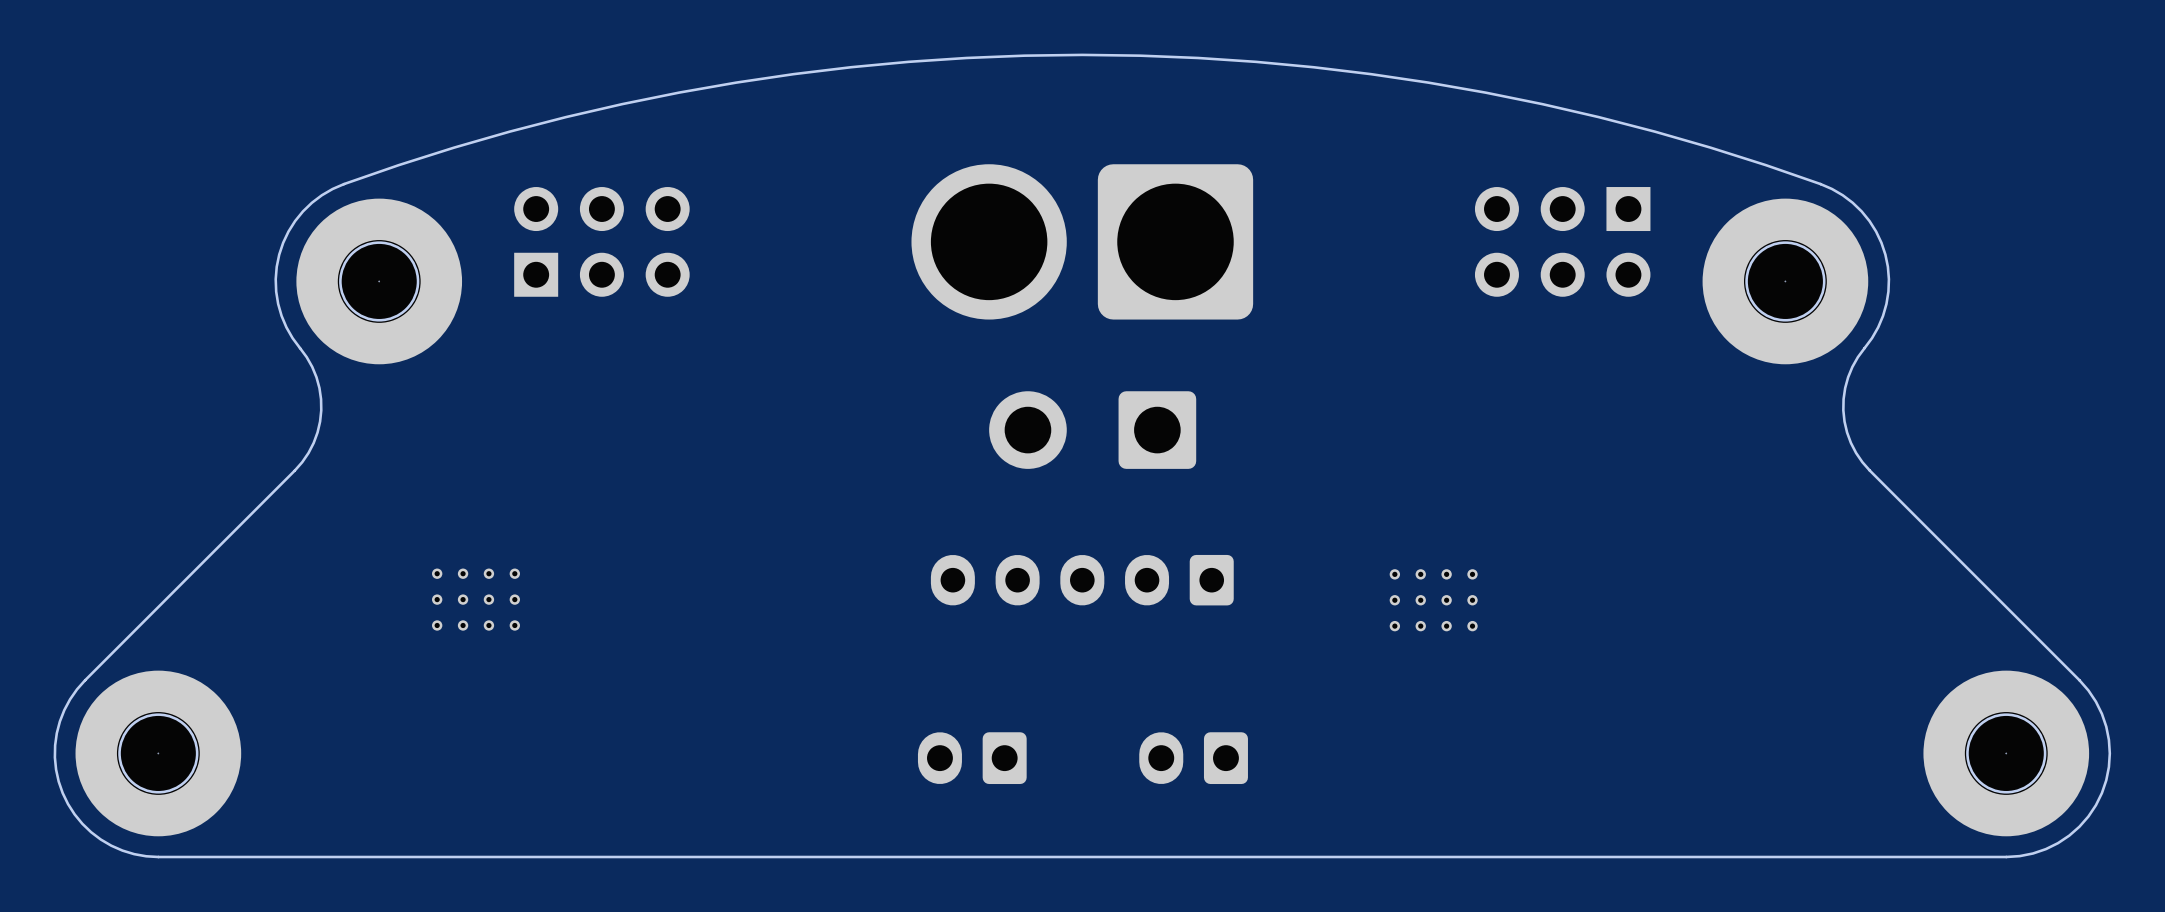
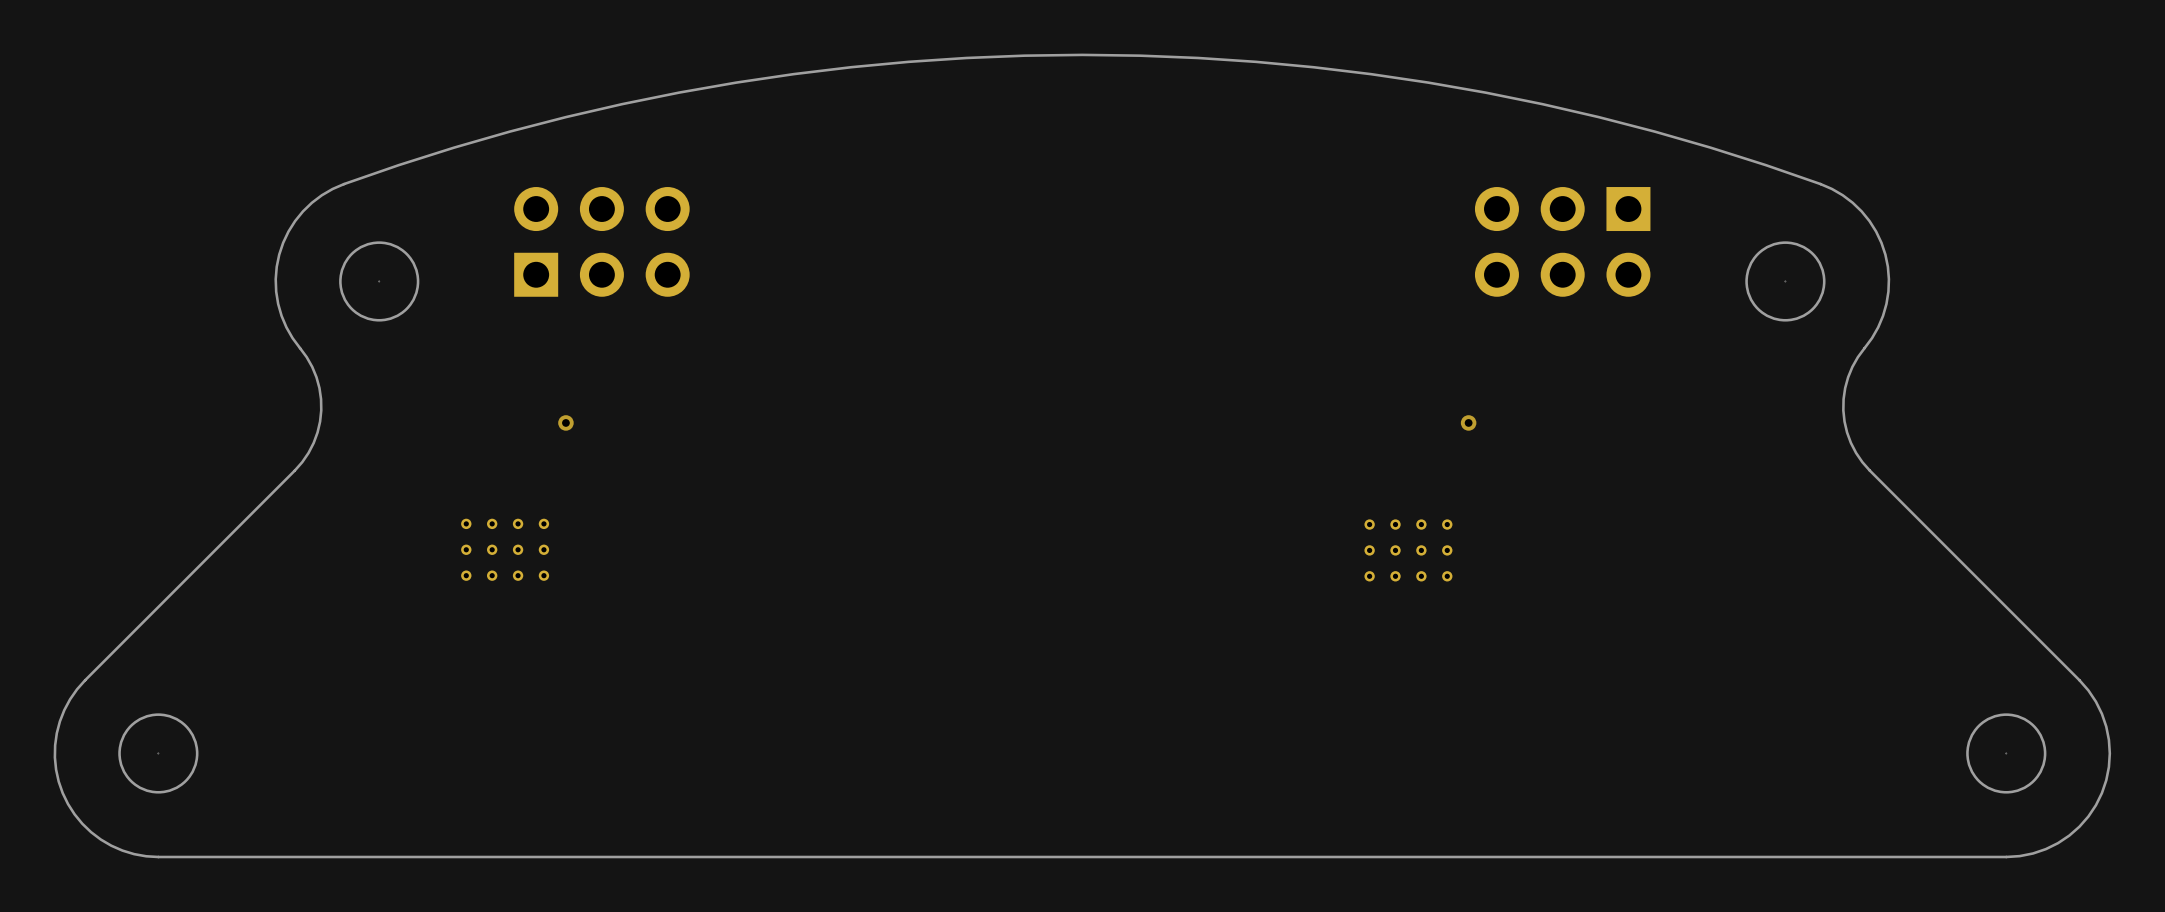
part: (1082, 241) -> none
part: (379, 281) -> none
part: (1785, 281) -> none
via: none -> (565, 422)
via: none -> (1468, 422)
part: (1092, 430) -> none
part: (1082, 580) -> none
part position: (475, 599) -> (505, 549)
part position: (1433, 600) -> (1408, 550)
part: (158, 753) -> none
part: (2006, 753) -> none
part: (972, 758) -> none
part: (1193, 758) -> none

